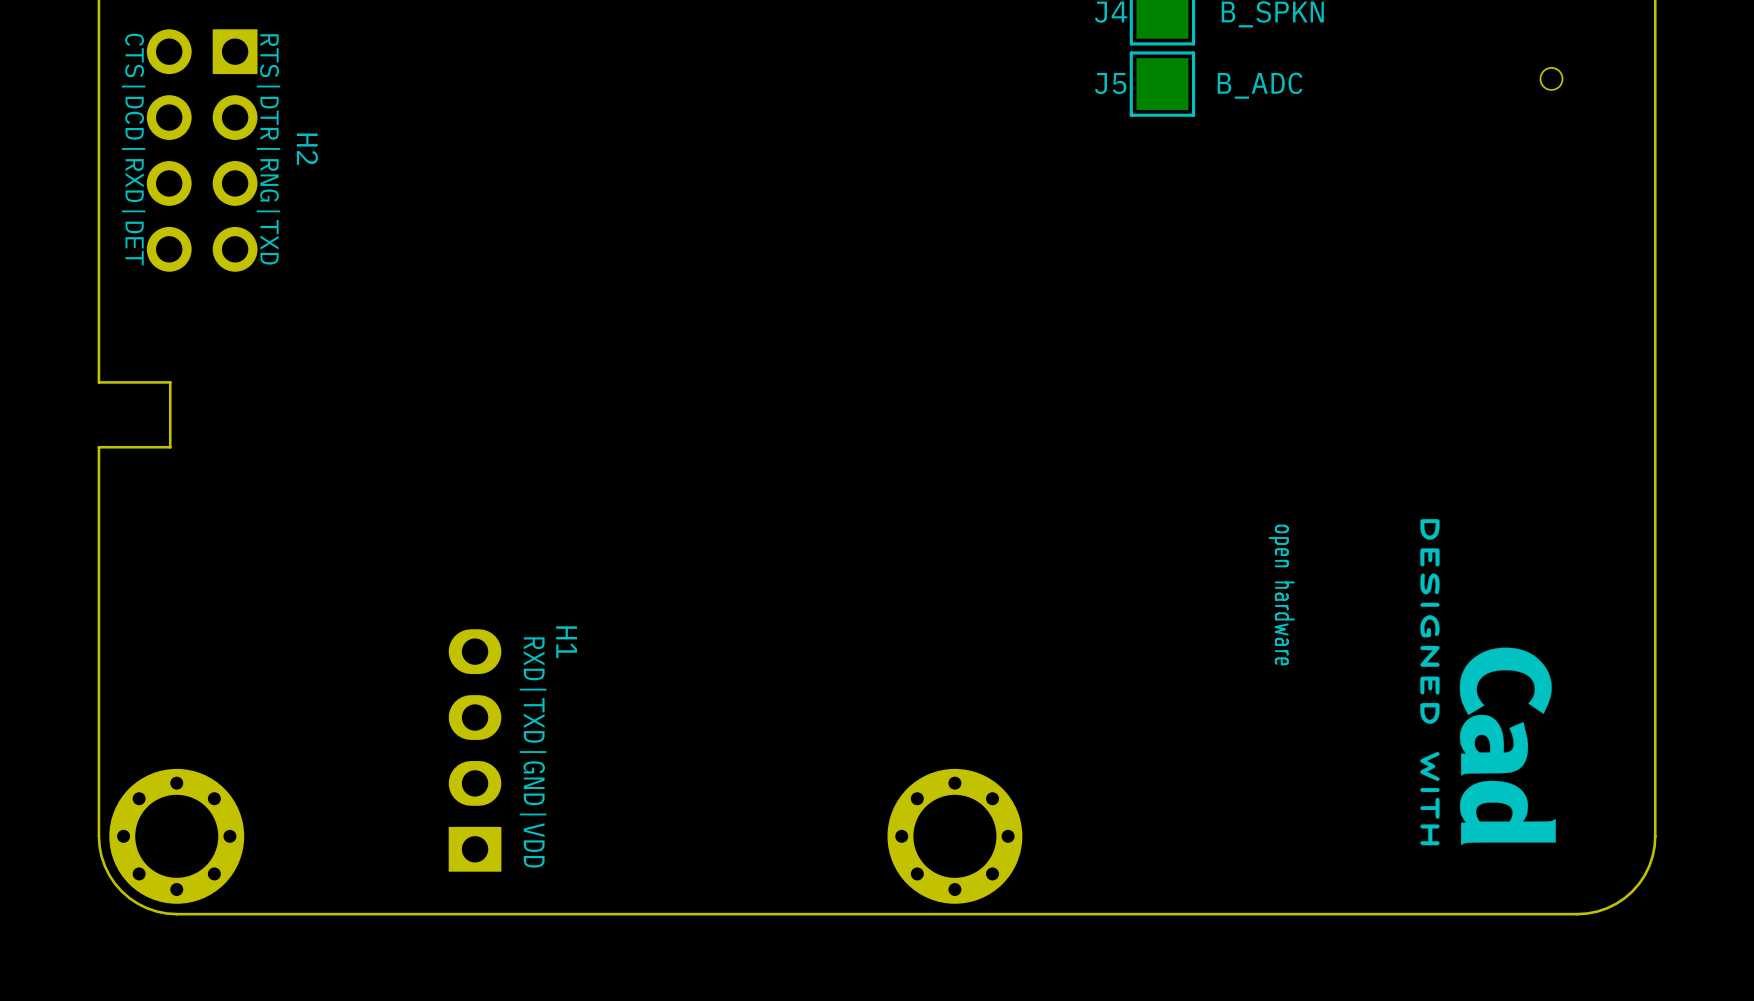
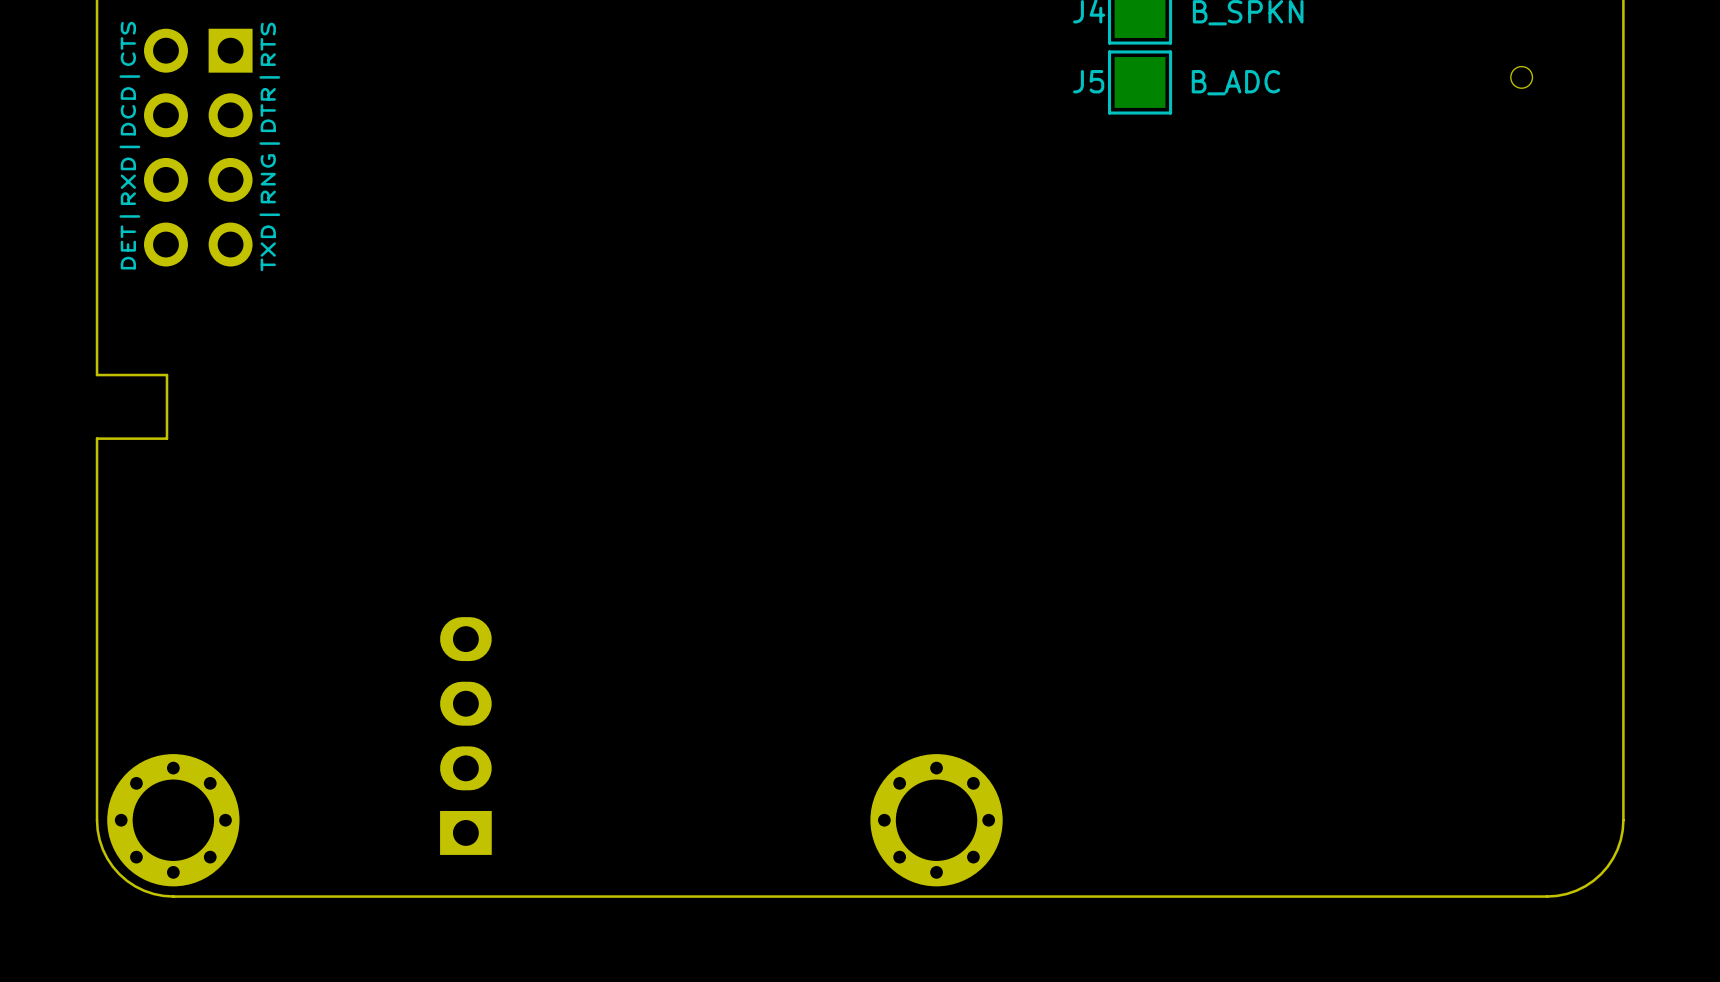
text: CTS|DCD|RXD|DET (133, 149) -> DET|RXD|DCD|CTS (129, 145)
text: RTS|DTR|RNG|TXD (268, 149) -> TXD|RNG|DTR|RTS (269, 146)
H2 name: H2 (307, 149) -> none
drawing: [1420, 519, 1556, 846] -> none
drawing: [1268, 524, 1295, 666] -> none
H1 name: H1 (566, 642) -> none
text: RXD|TXD|GND|VDD (533, 752) -> none

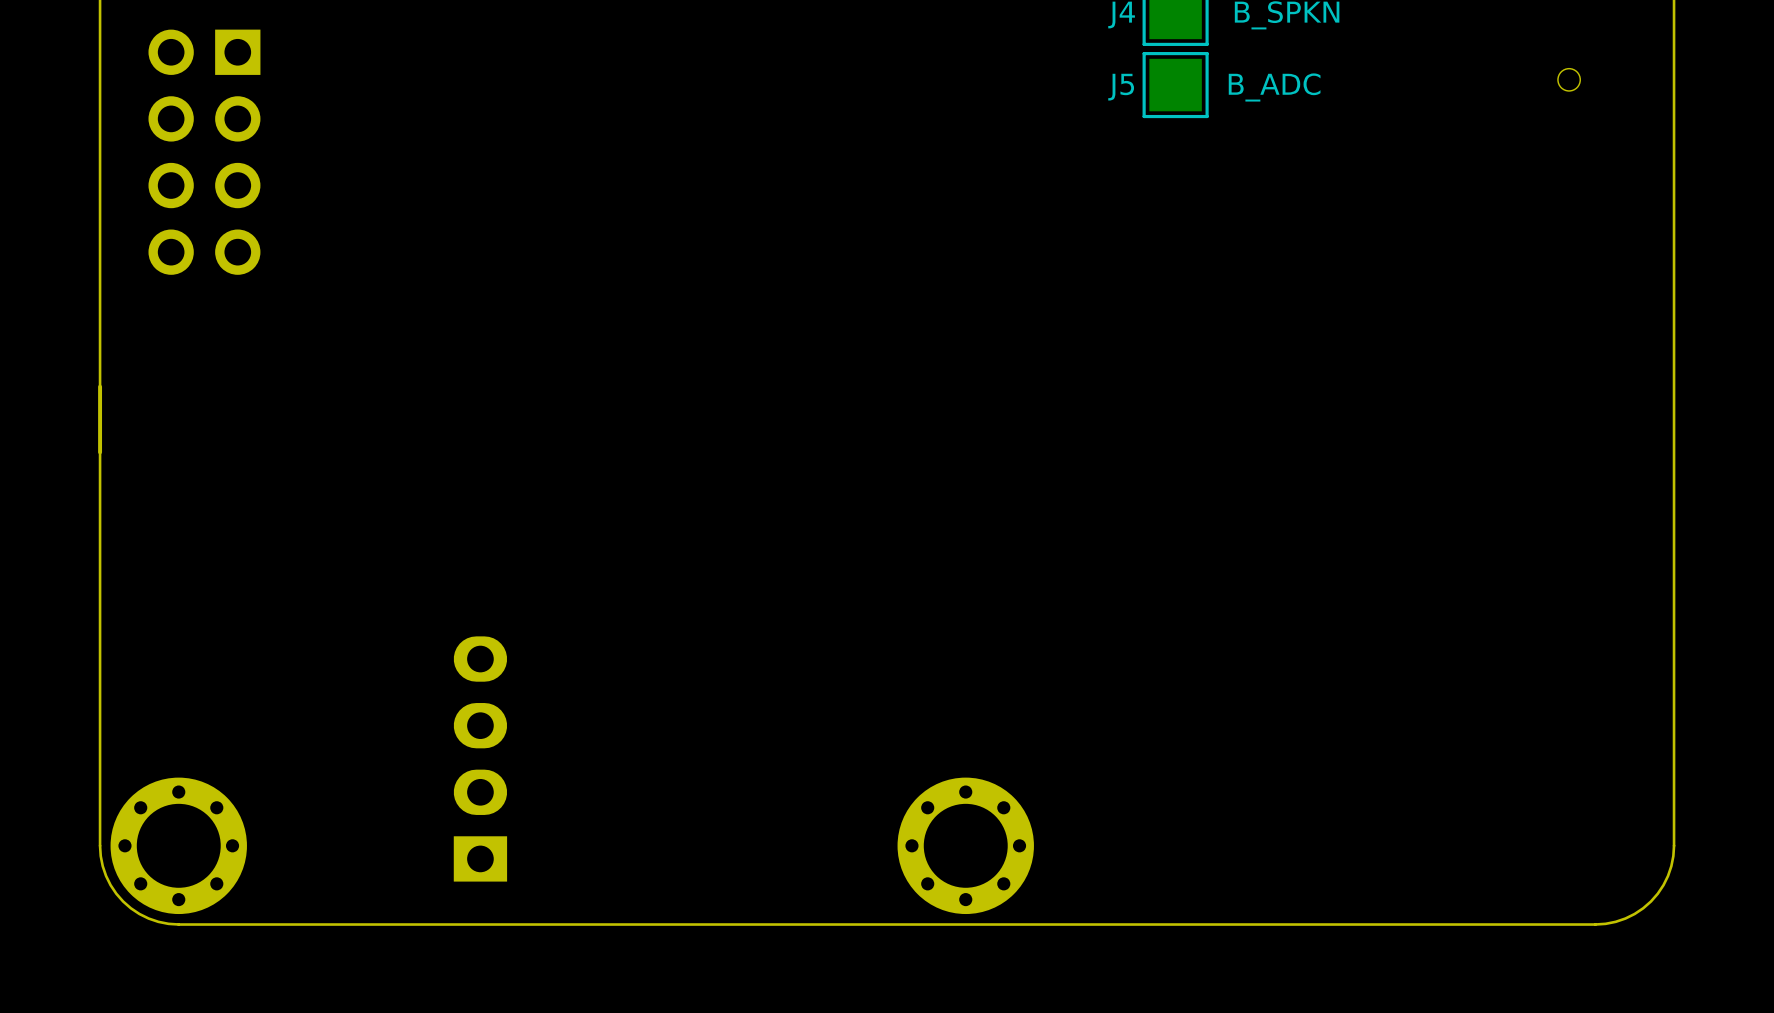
text: DET|RXD|DCD|CTS (129, 145) -> none
text: TXD|RNG|DTR|RTS (269, 146) -> none
board edge: (97, 375) (166, 375) (166, 438) (97, 438) -> (100, 386) (100, 452)

